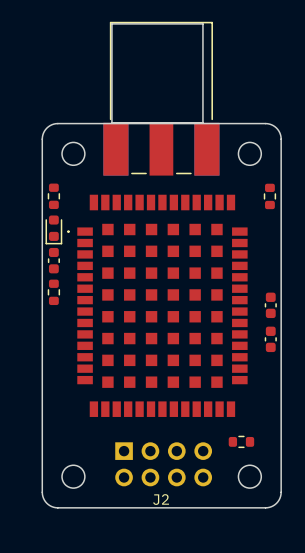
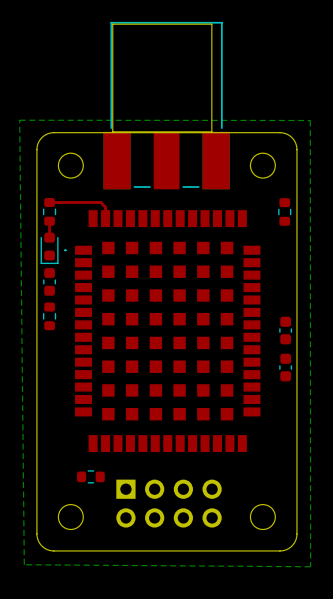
bottom zone outline: none -> (19, 120) (310, 120) (310, 566) (24, 564) (19, 120)
top track: none -> (49, 202) (100, 202) (105, 207) (105, 218)
top track: none -> (49, 221) (49, 237)
part position: (241, 441) -> (90, 476)
J2 name: J2 (161, 499) -> none

